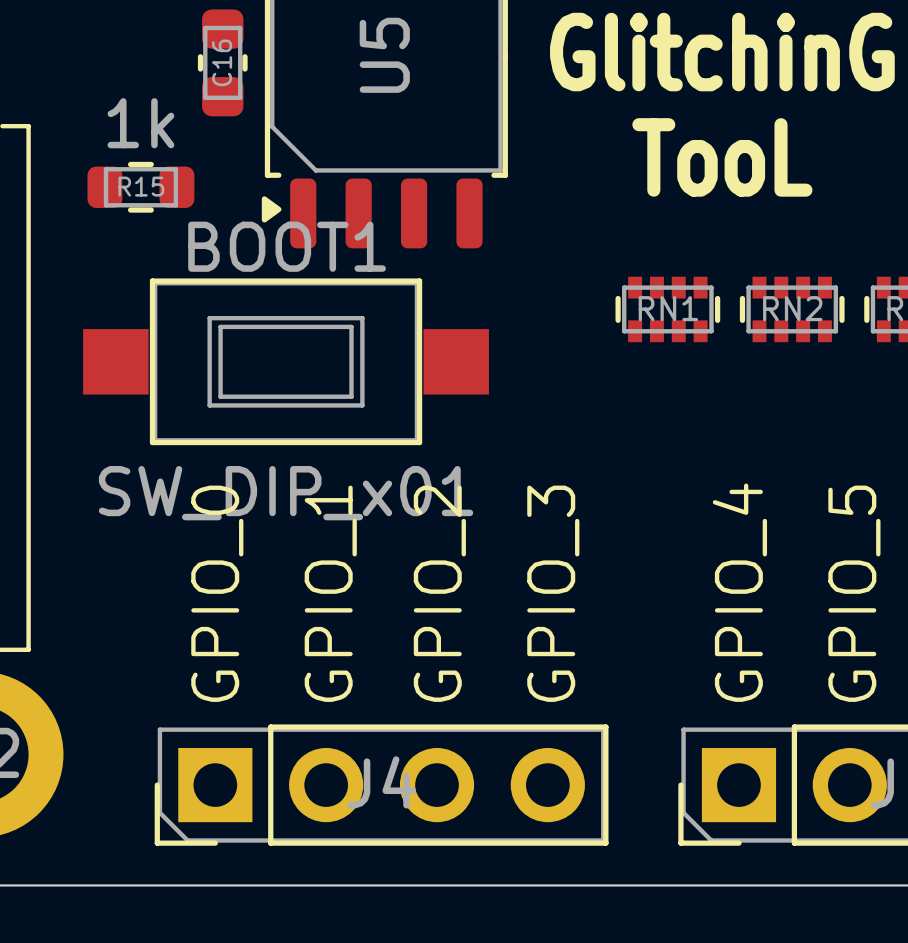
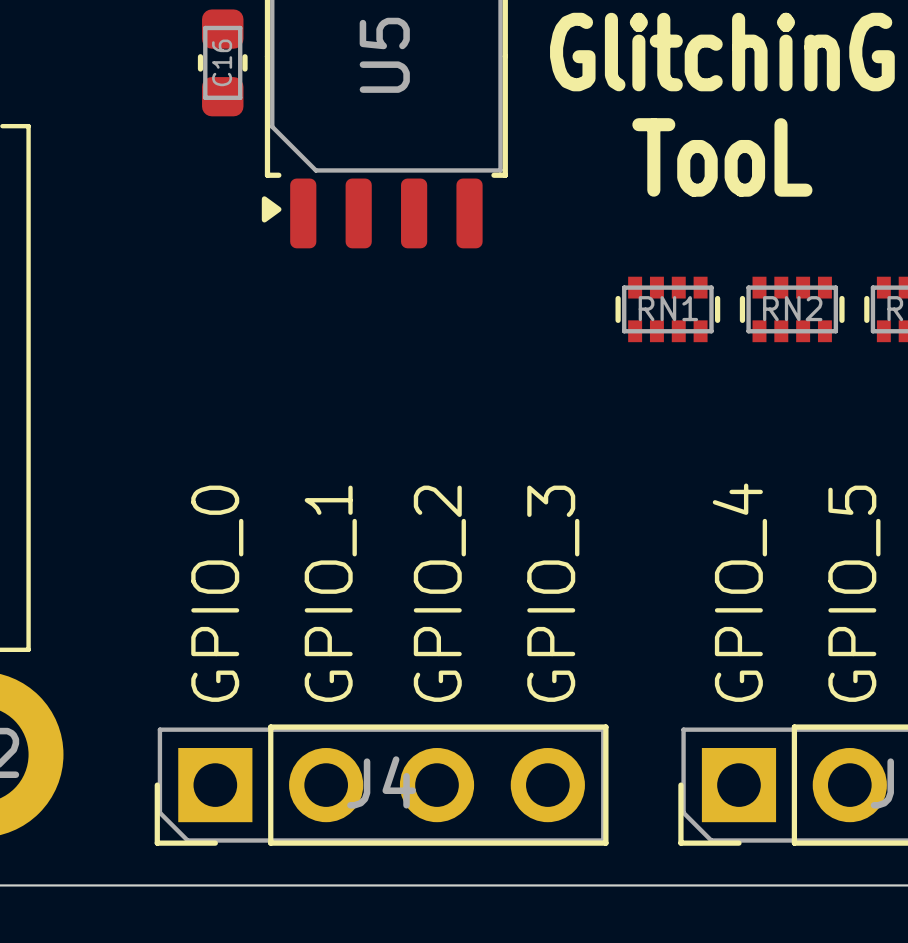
R15: 1k (140, 187) -> none
BOOT1: SW_DIP_x01 (286, 361) -> none

